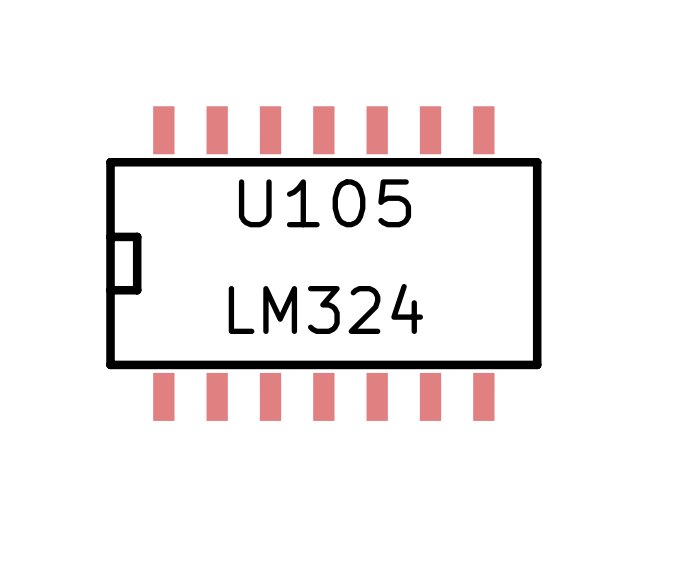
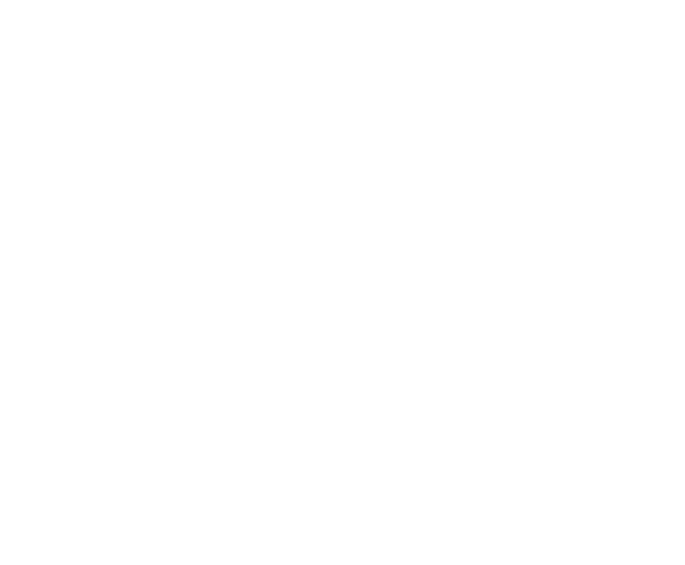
U105: LM324 (323, 263) -> none

